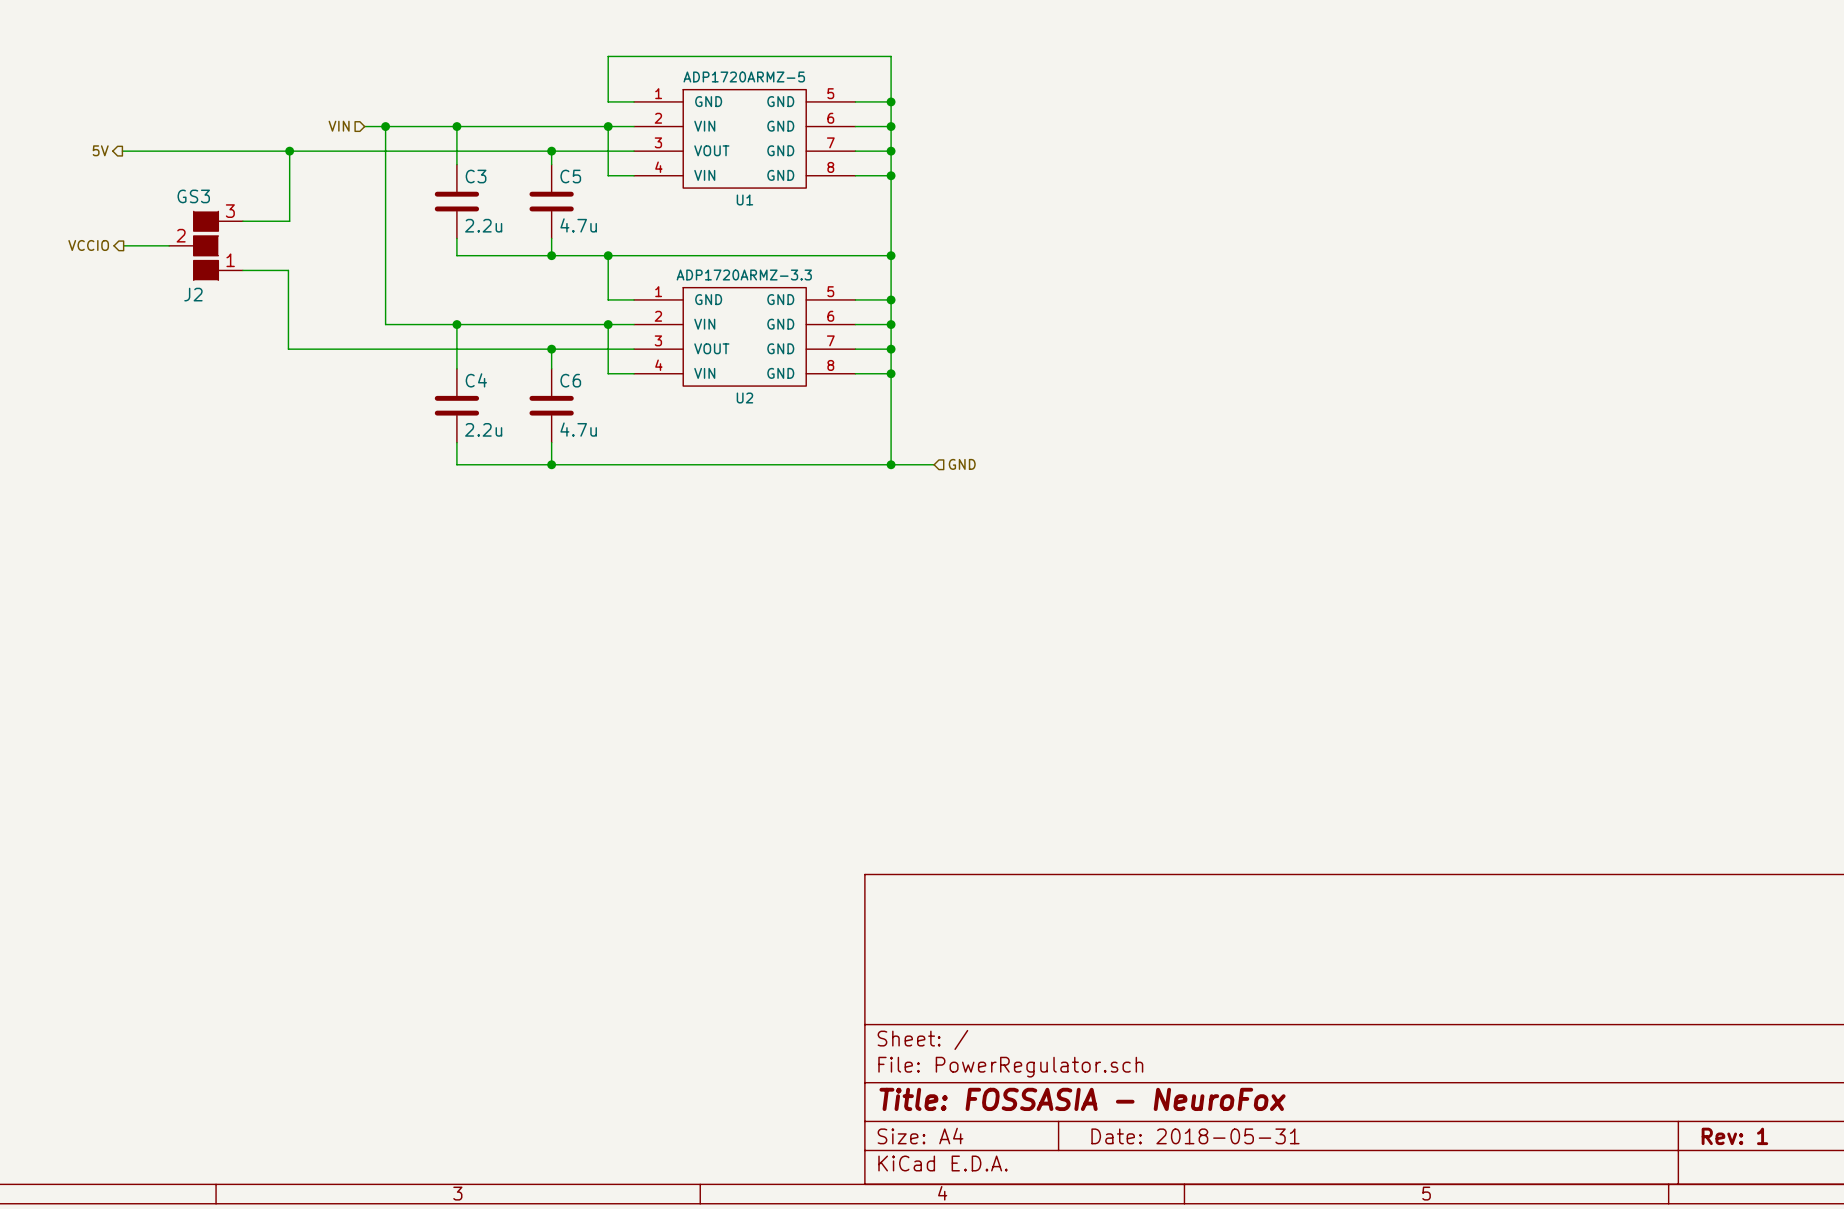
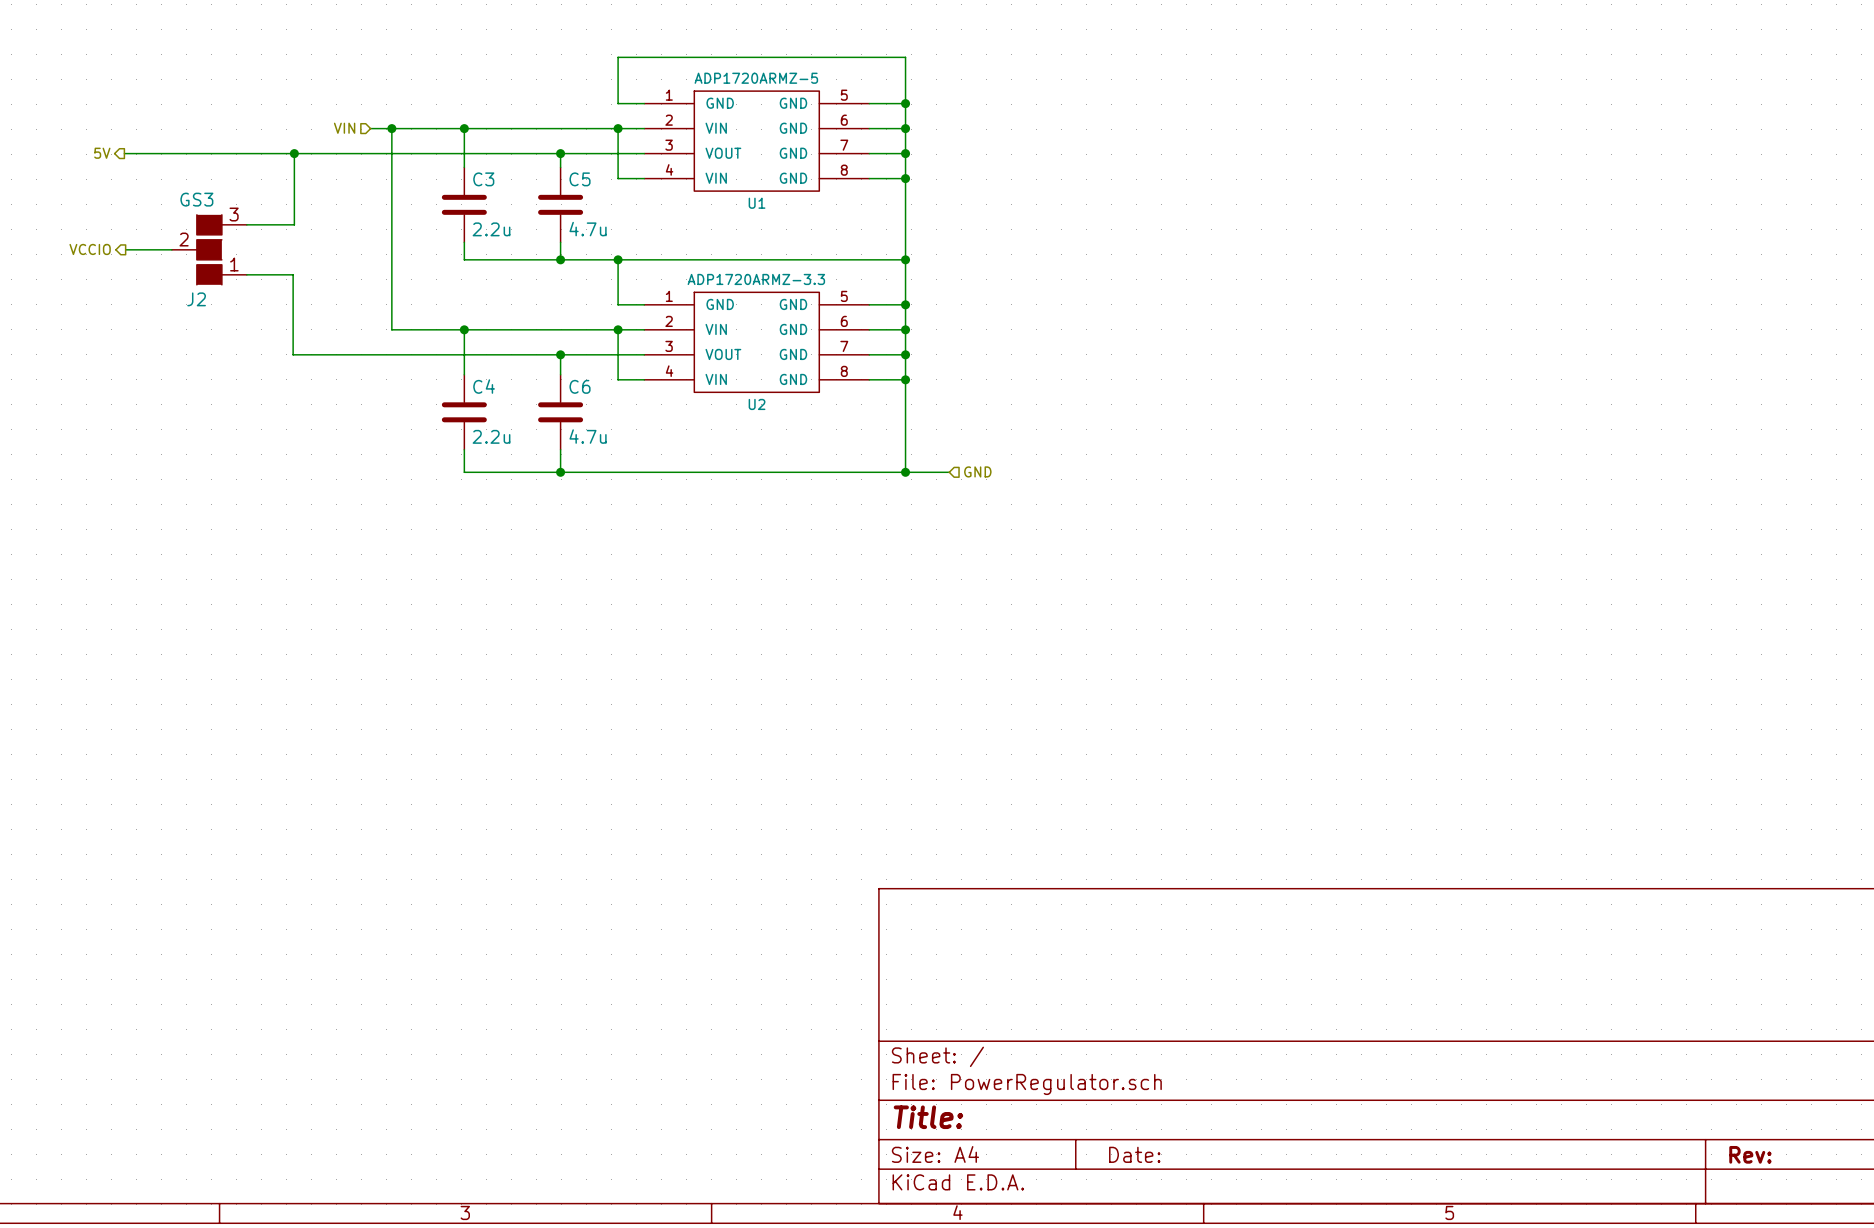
title block: Title: FOSSASIA - NeuroFox (1082, 1099) -> Title: (928, 1117)
title block: Date: 2018-05-31 (1195, 1136) -> Date: (1134, 1154)
title block: Rev: 1 (1734, 1136) -> Rev: (1750, 1154)

